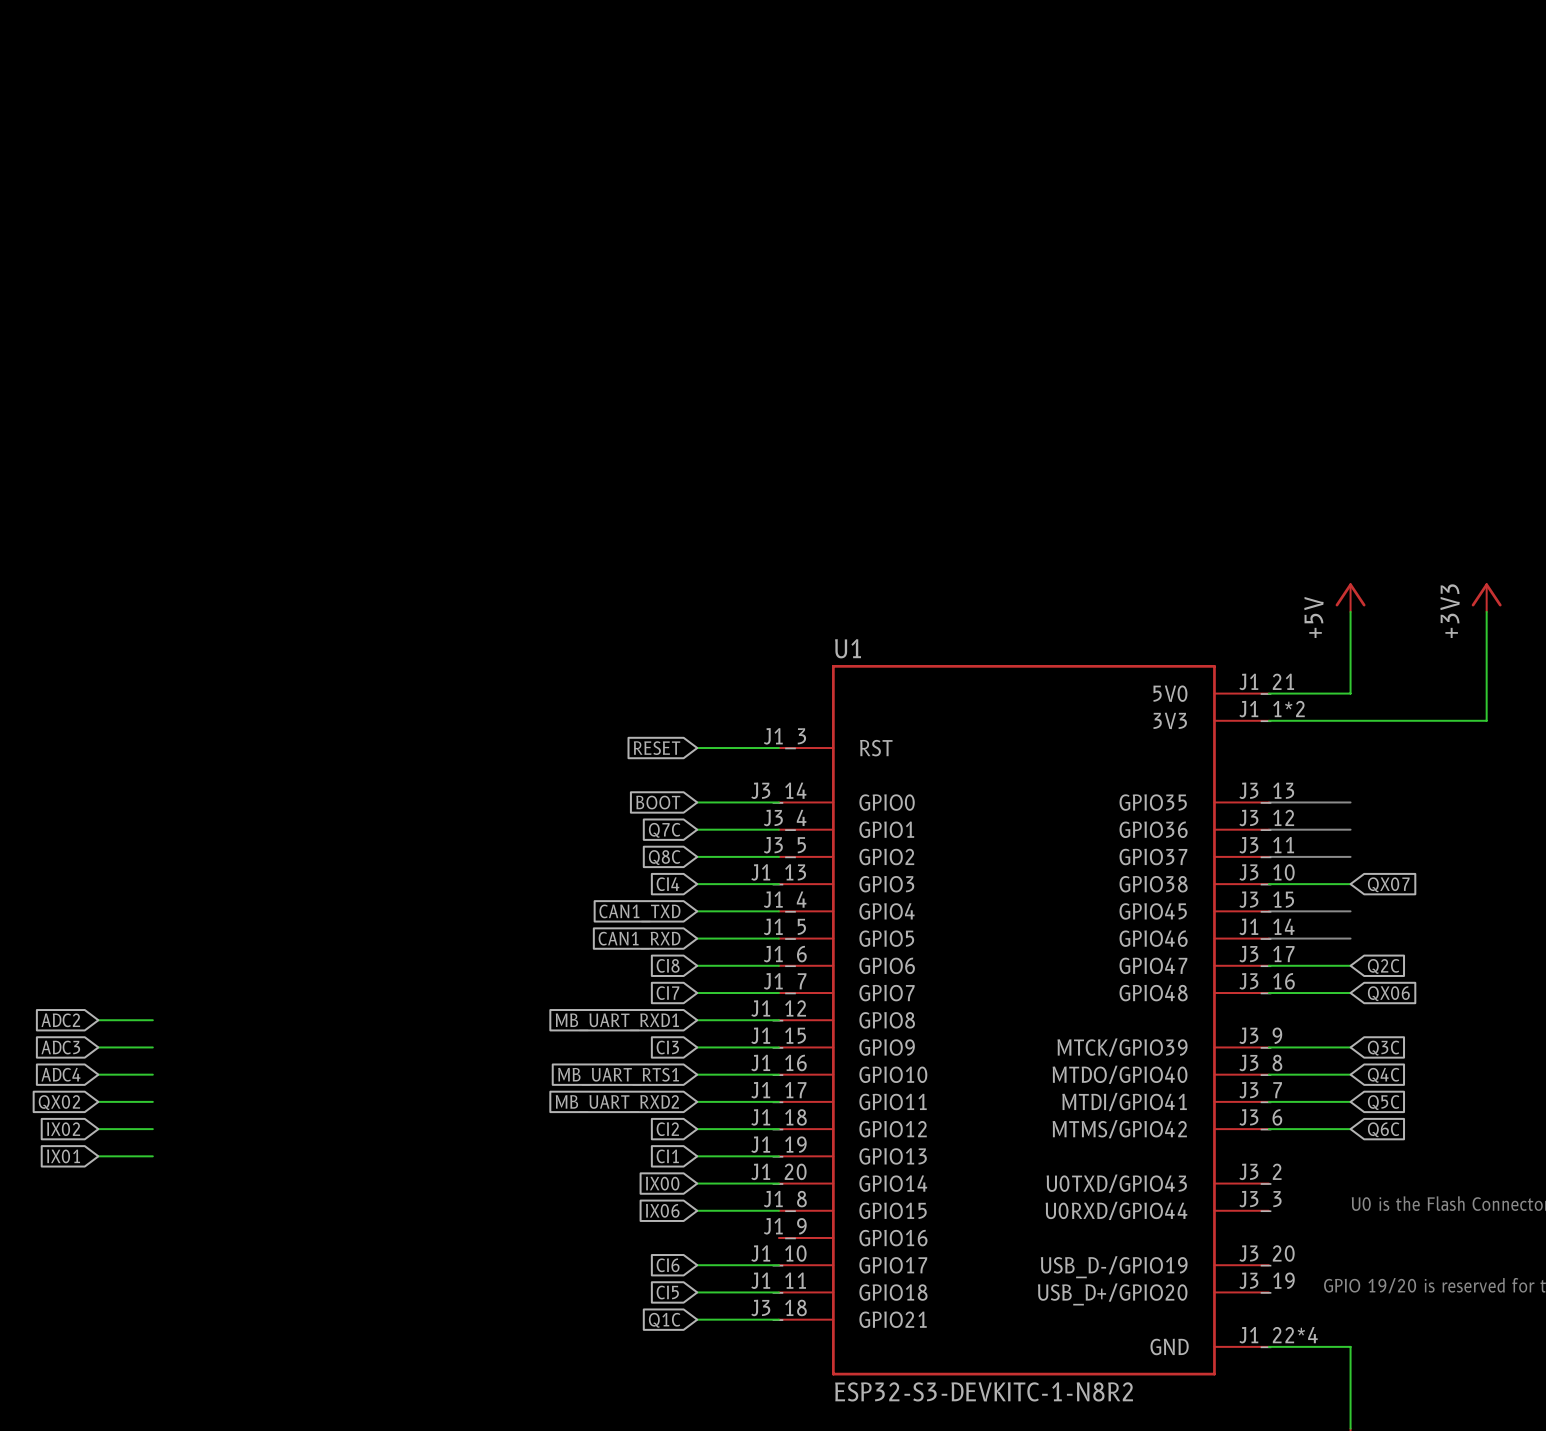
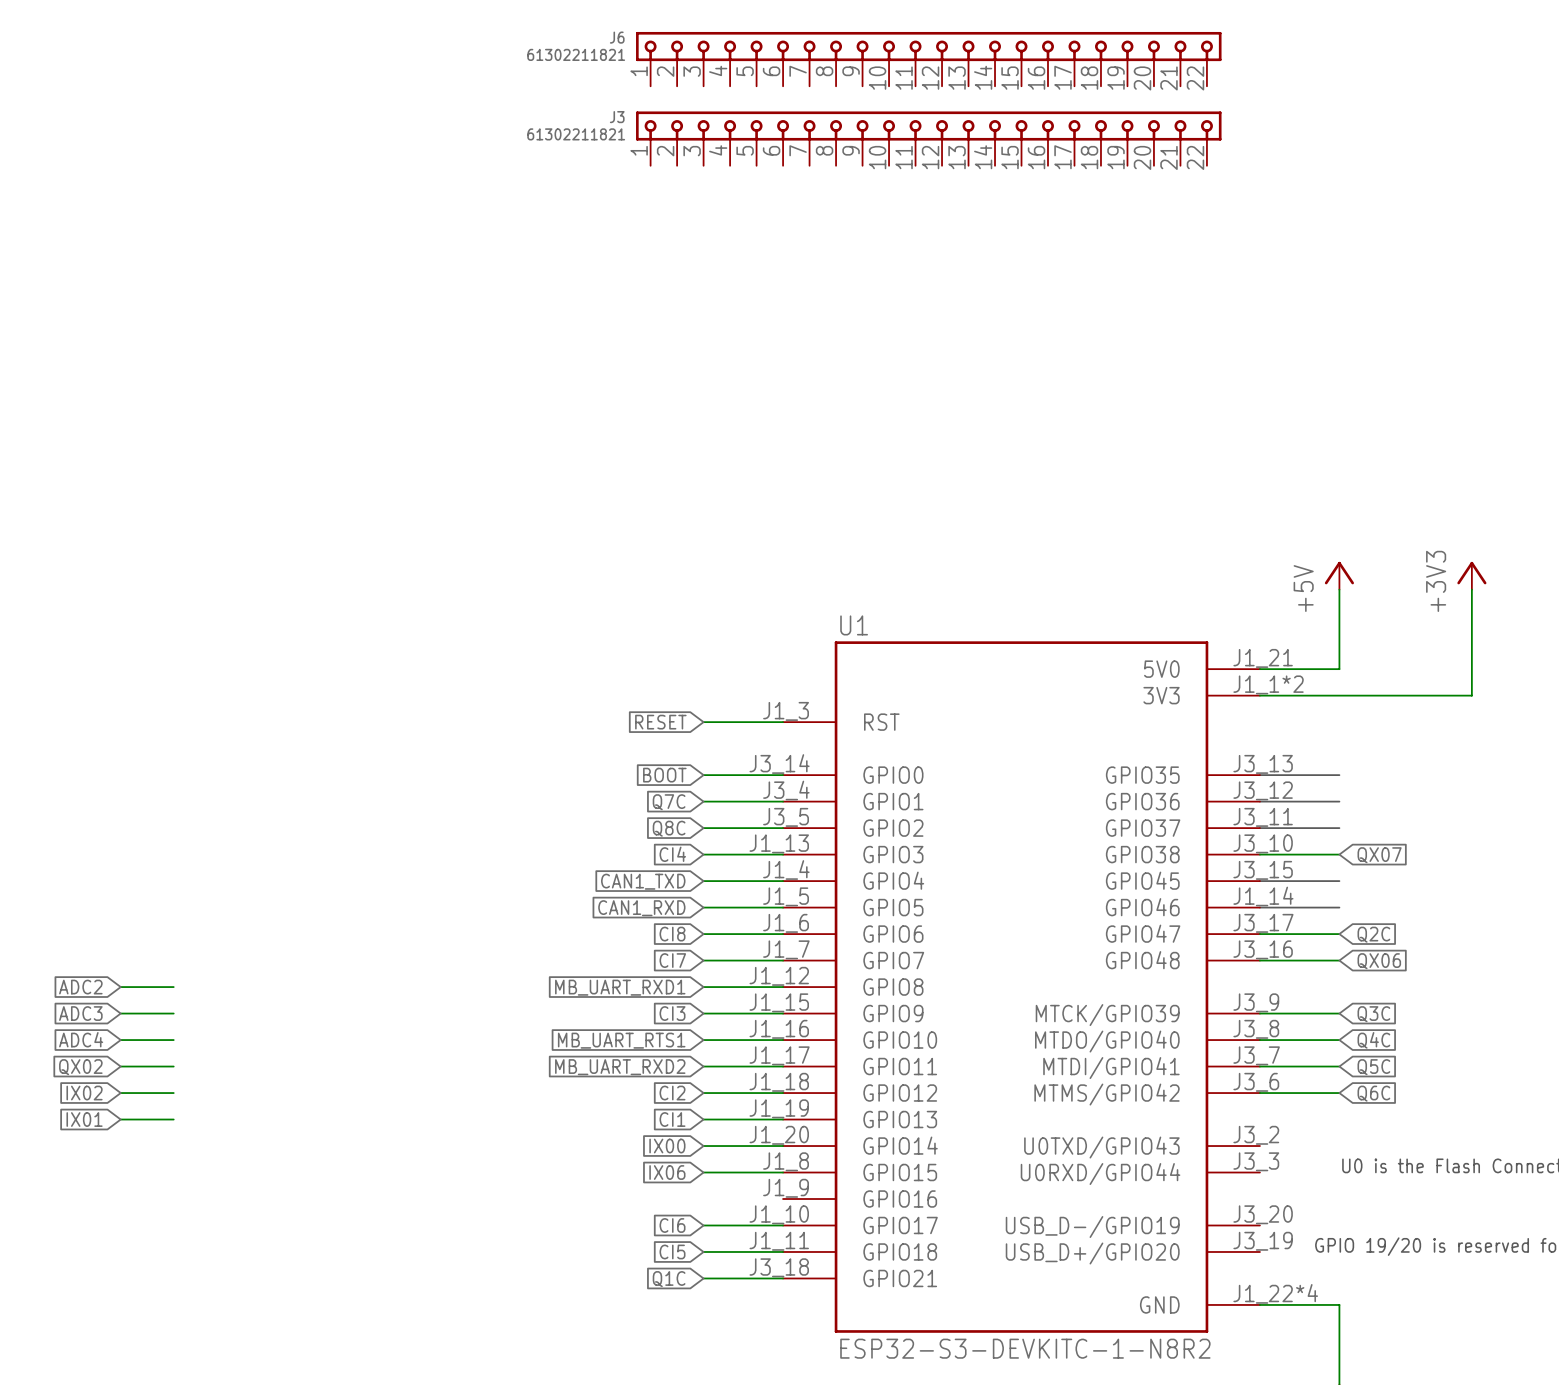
J6: none -> 61302211821 (928, 59)
J3: none -> 61302211821 (928, 138)

